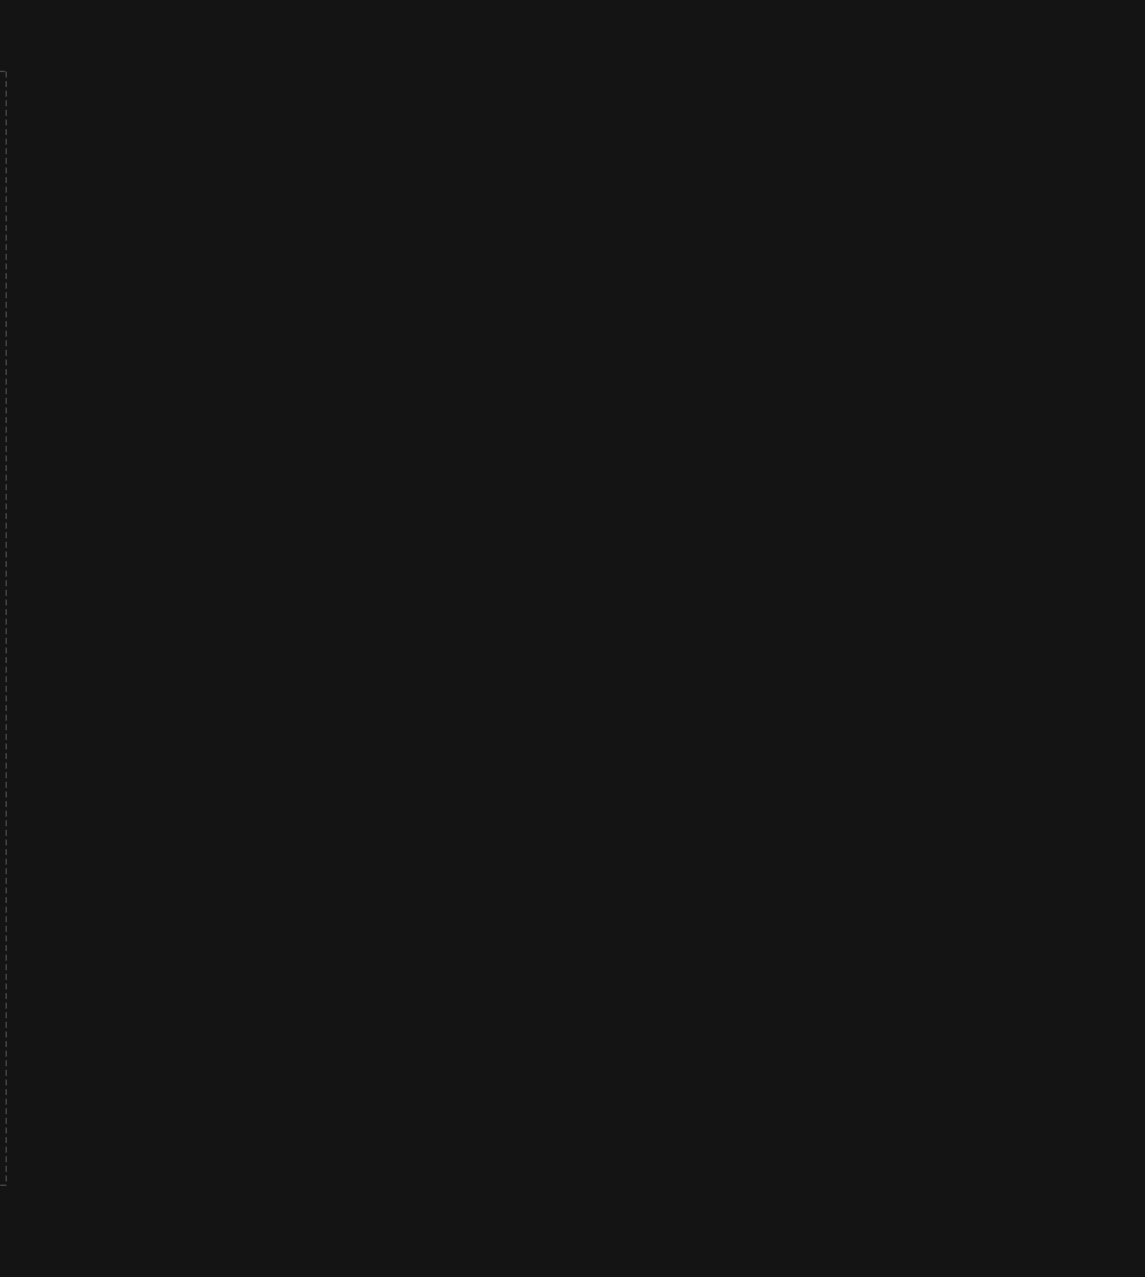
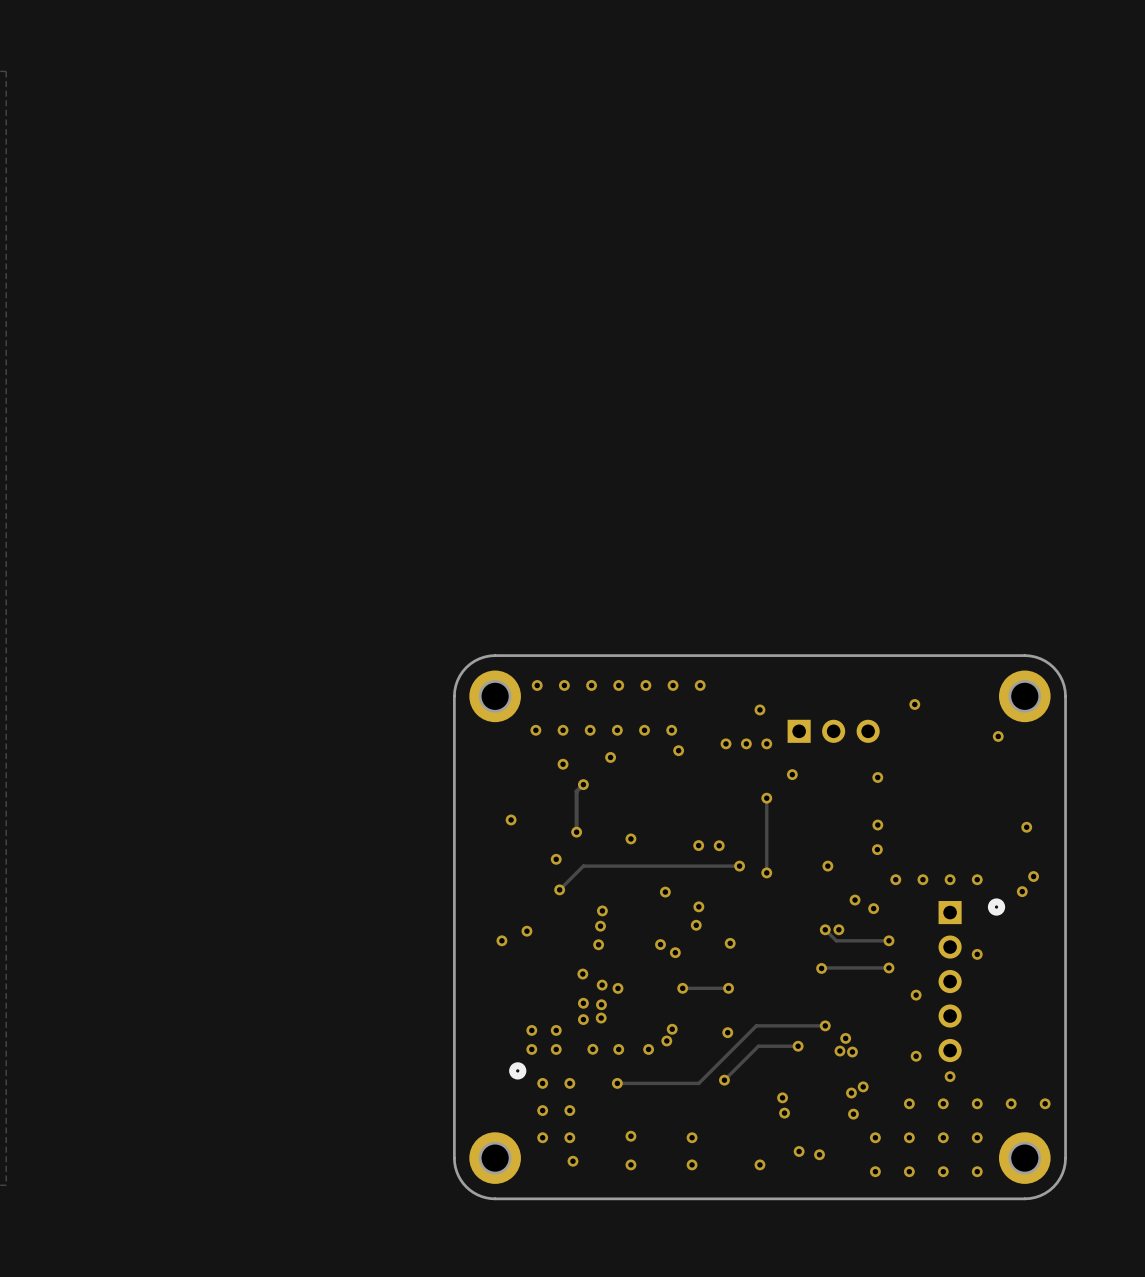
board edge: none -> (1024, 655) (495, 655) (479, 658) (466, 667) (457, 680) (454, 696) (454, 1158) (458, 1175) (466, 1186) (477, 1194) (495, 1198) (1024, 1198) (1040, 1195) (1053, 1186) (1062, 1173) (1065, 1158) (1065, 696) (1062, 680) (1053, 667) (1040, 658) (1024, 655)
round board edge: none -> [478, 680, 512, 713]
round board edge: none -> [1008, 680, 1042, 713]
via: none -> (537, 685)
via: none -> (564, 685)
via: none -> (591, 685)
via: none -> (618, 685)
via: none -> (645, 685)
via: none -> (673, 685)
via: none -> (700, 685)
part: none -> (495, 696)
part: none -> (1024, 696)
via: none -> (914, 704)
via: none -> (759, 709)
via: none -> (535, 730)
via: none -> (563, 730)
via: none -> (590, 730)
via: none -> (617, 730)
via: none -> (644, 730)
via: none -> (671, 730)
part: none -> (833, 731)
via: none -> (998, 736)
via: none -> (726, 743)
via: none -> (746, 743)
via: none -> (766, 743)
via: none -> (678, 750)
via: none -> (610, 757)
via: none -> (563, 764)
via: none -> (792, 774)
via: none -> (877, 777)
track: none -> (583, 784) (576, 791) (576, 832)
via: none -> (583, 784)
track: none -> (766, 798) (766, 872)
via: none -> (766, 798)
via: none -> (511, 819)
via: none -> (877, 825)
via: none -> (1026, 827)
via: none -> (576, 832)
via: none -> (630, 838)
via: none -> (698, 845)
via: none -> (719, 845)
via: none -> (877, 849)
via: none -> (556, 859)
track: none -> (739, 866) (583, 866) (559, 889)
via: none -> (739, 866)
via: none -> (827, 866)
via: none -> (766, 872)
via: none -> (1033, 876)
via: none -> (895, 879)
via: none -> (922, 879)
via: none -> (950, 879)
via: none -> (977, 879)
via: none -> (559, 889)
via: none -> (1022, 891)
via: none -> (665, 892)
via: none -> (855, 900)
via: none -> (698, 906)
part: none -> (996, 907)
via: none -> (873, 908)
via: none -> (602, 910)
via: none -> (696, 925)
via: none -> (600, 926)
track: none -> (825, 929) (836, 940) (888, 940)
via: none -> (825, 929)
via: none -> (838, 929)
via: none -> (526, 931)
via: none -> (501, 940)
via: none -> (888, 940)
via: none -> (730, 943)
via: none -> (598, 944)
via: none -> (660, 944)
via: none -> (675, 952)
via: none -> (977, 954)
track: none -> (888, 967) (821, 968)
via: none -> (888, 967)
via: none -> (821, 968)
via: none -> (582, 974)
part: none -> (950, 981)
via: none -> (602, 985)
via: none -> (618, 988)
via: none -> (682, 988)
track: none -> (728, 988) (682, 988)
via: none -> (728, 988)
via: none -> (916, 995)
via: none -> (583, 1003)
via: none -> (601, 1004)
via: none -> (601, 1018)
via: none -> (583, 1019)
track: none -> (825, 1025) (756, 1025) (698, 1083) (617, 1083)
via: none -> (825, 1025)
via: none -> (672, 1029)
via: none -> (531, 1030)
via: none -> (556, 1030)
via: none -> (727, 1032)
via: none -> (845, 1038)
via: none -> (666, 1040)
track: none -> (798, 1046) (758, 1046) (724, 1080)
via: none -> (798, 1046)
via: none -> (531, 1049)
via: none -> (556, 1049)
via: none -> (592, 1049)
via: none -> (618, 1049)
via: none -> (648, 1049)
via: none -> (839, 1051)
via: none -> (852, 1052)
via: none -> (916, 1056)
part: none -> (517, 1070)
via: none -> (950, 1076)
via: none -> (724, 1080)
via: none -> (542, 1083)
via: none -> (569, 1083)
via: none -> (617, 1083)
via: none -> (863, 1086)
via: none -> (851, 1093)
via: none -> (782, 1097)
via: none -> (909, 1103)
via: none -> (943, 1103)
via: none -> (977, 1103)
via: none -> (1011, 1103)
via: none -> (1045, 1103)
via: none -> (542, 1110)
via: none -> (569, 1110)
via: none -> (784, 1113)
via: none -> (853, 1114)
via: none -> (630, 1136)
via: none -> (542, 1137)
via: none -> (569, 1137)
via: none -> (692, 1137)
via: none -> (875, 1137)
via: none -> (909, 1137)
via: none -> (943, 1137)
via: none -> (977, 1137)
round board edge: none -> [478, 1141, 512, 1175]
round board edge: none -> [1008, 1141, 1042, 1175]
via: none -> (799, 1151)
via: none -> (819, 1154)
part: none -> (495, 1158)
part: none -> (1024, 1158)
via: none -> (572, 1161)
via: none -> (630, 1164)
via: none -> (692, 1164)
via: none -> (759, 1164)
via: none -> (875, 1171)
via: none -> (909, 1171)
via: none -> (943, 1171)
via: none -> (977, 1171)

